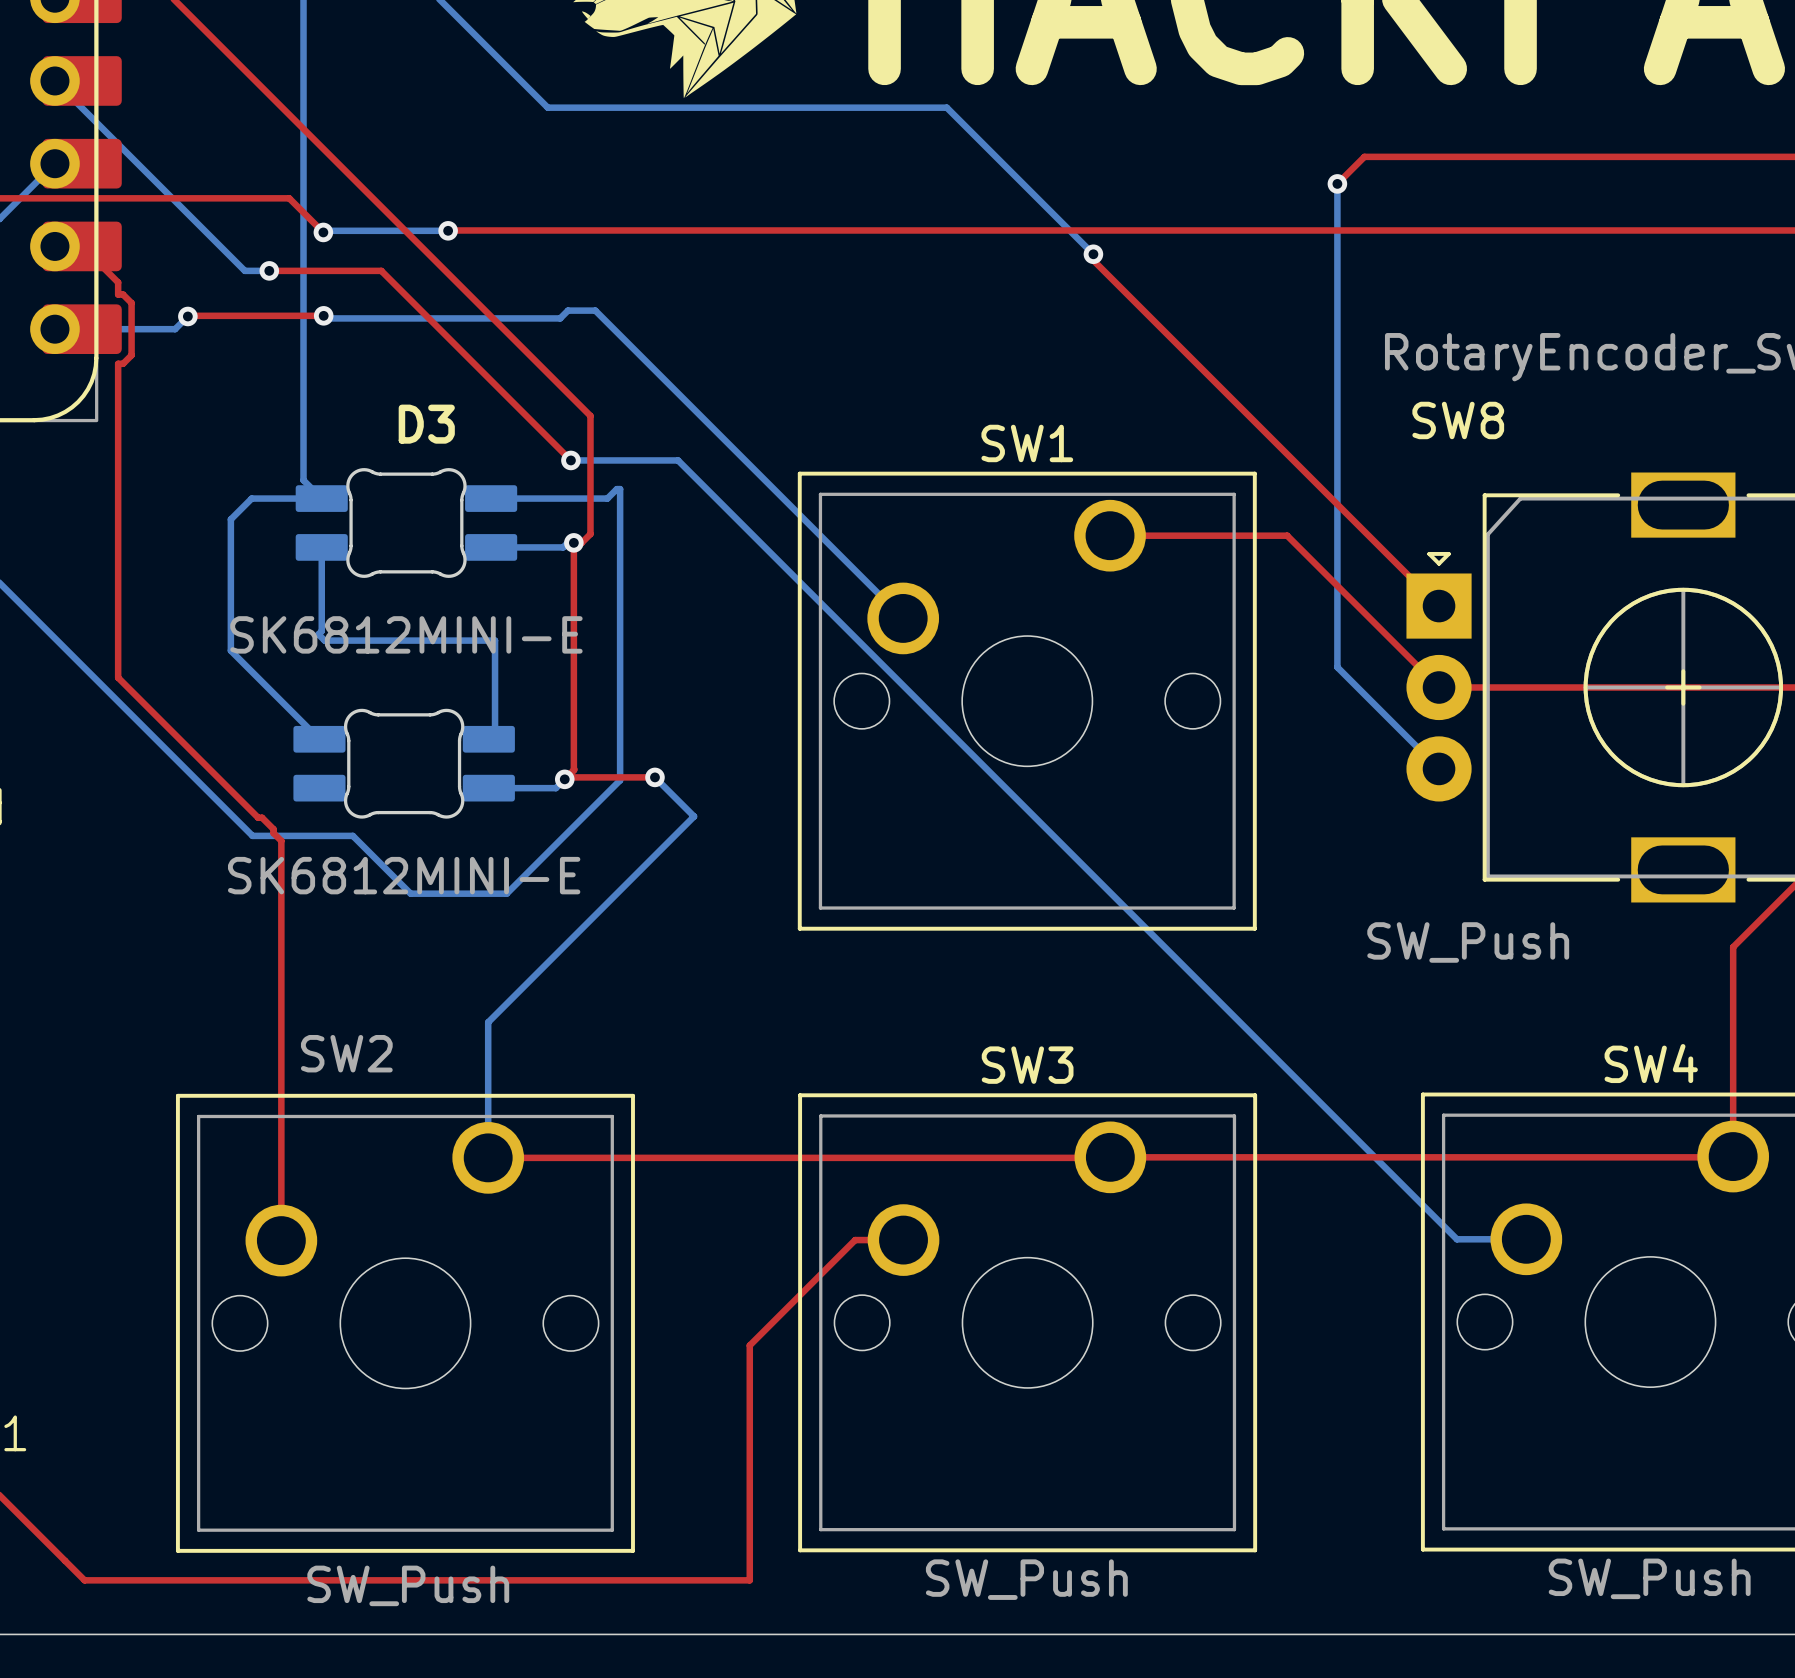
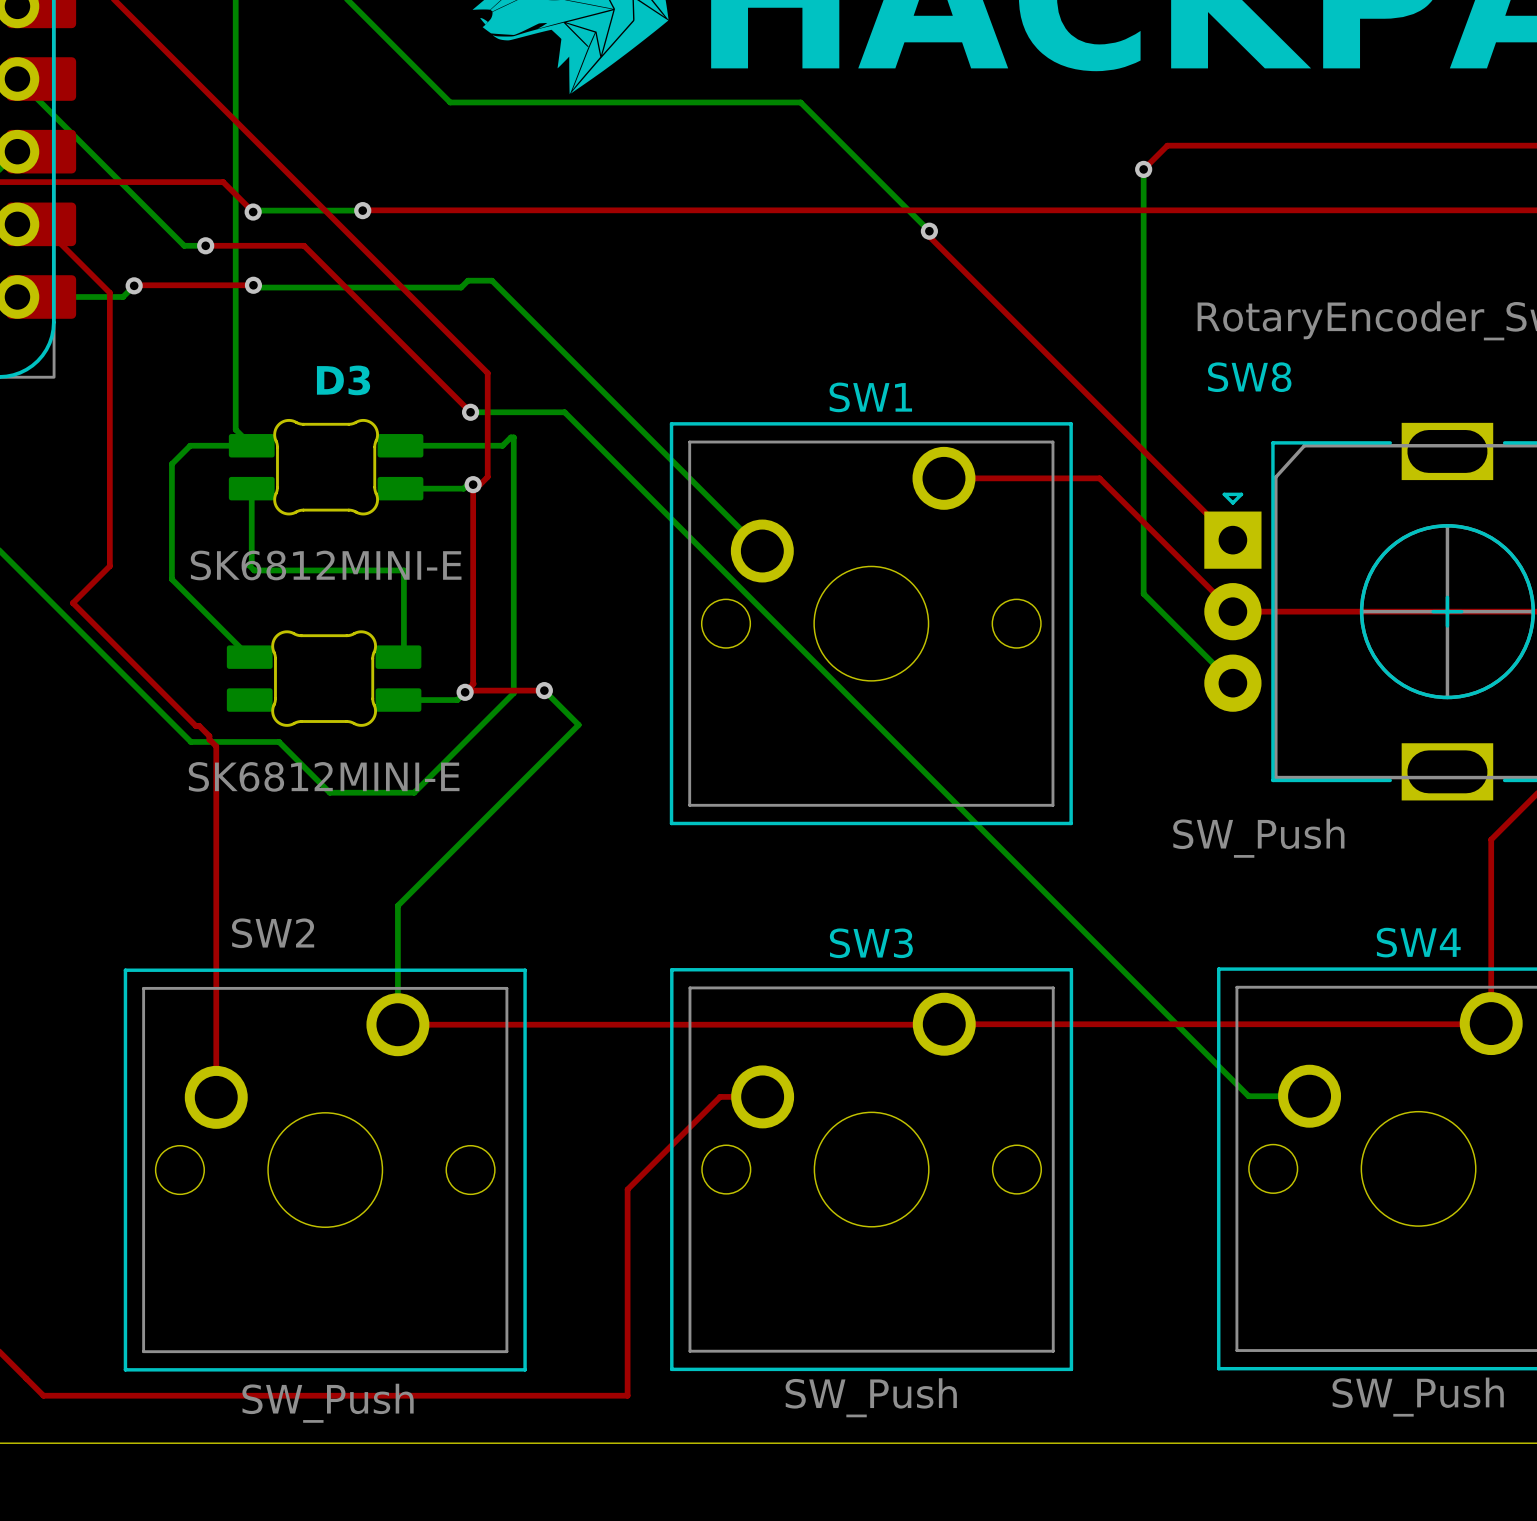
top track: (118, 282) (118, 294) (123, 294) (131, 303) (131, 355) (123, 363) (118, 363) (118, 677) -> (72, 255) (109, 292) (109, 566) (72, 603)

